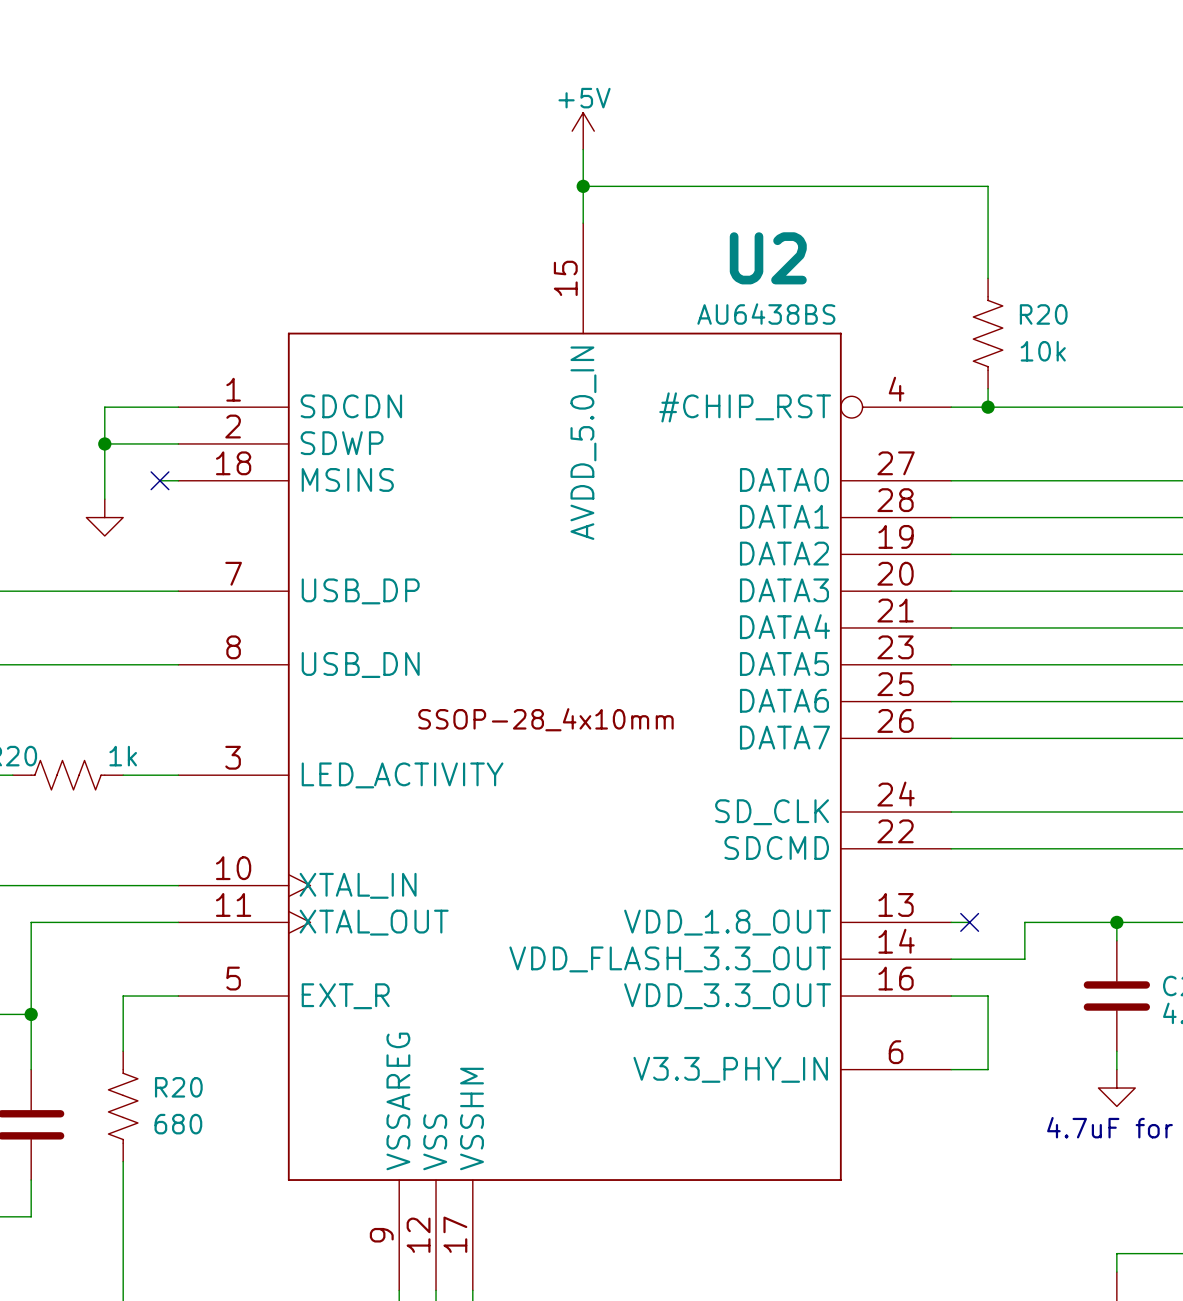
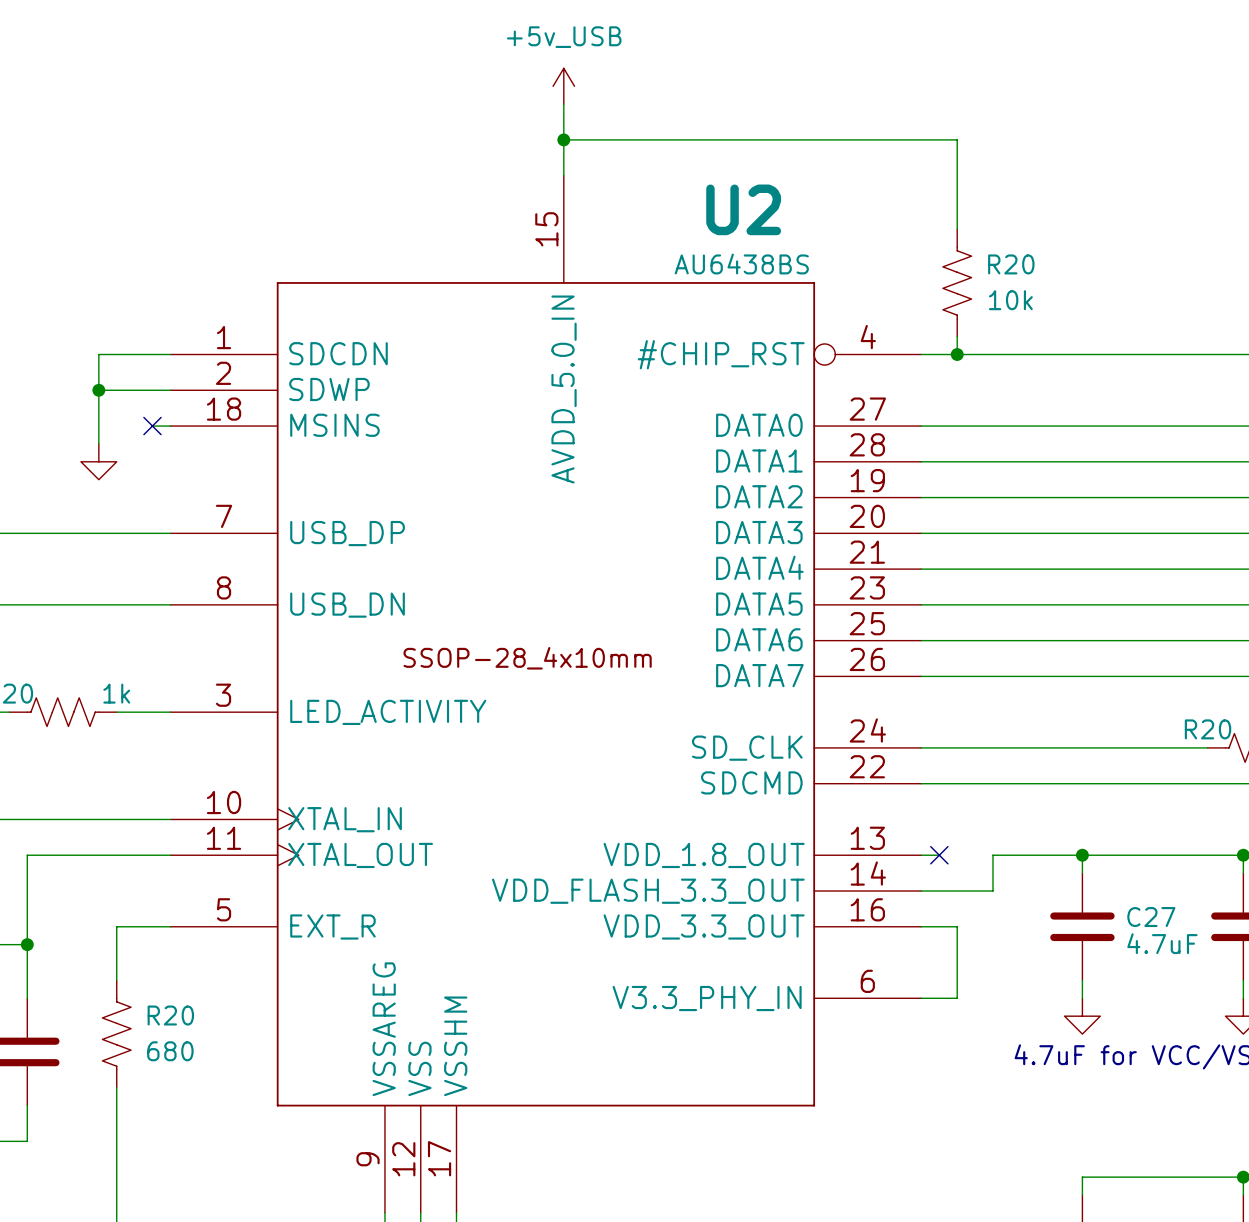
power symbol: +5V (583, 131) -> +5v_USB (563, 86)

